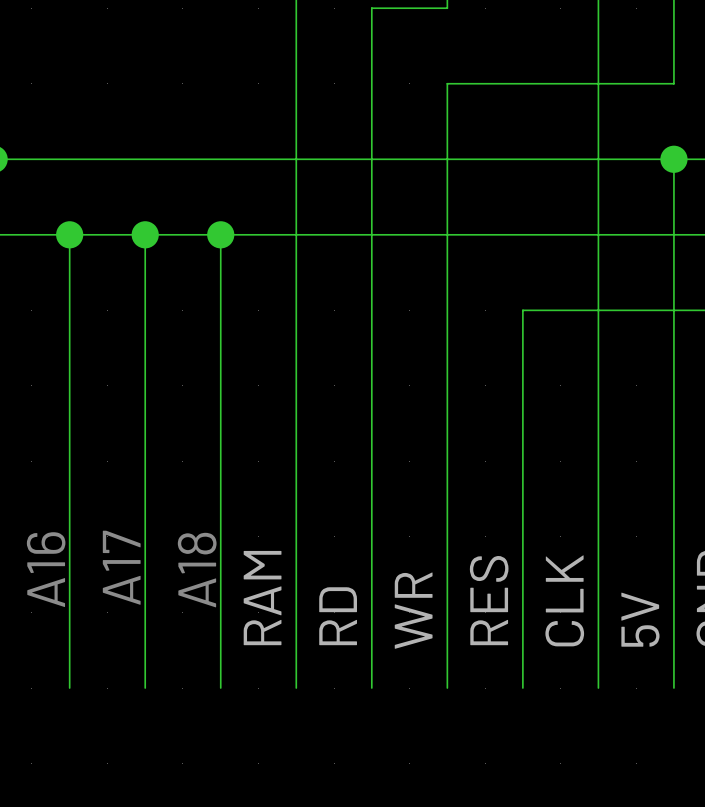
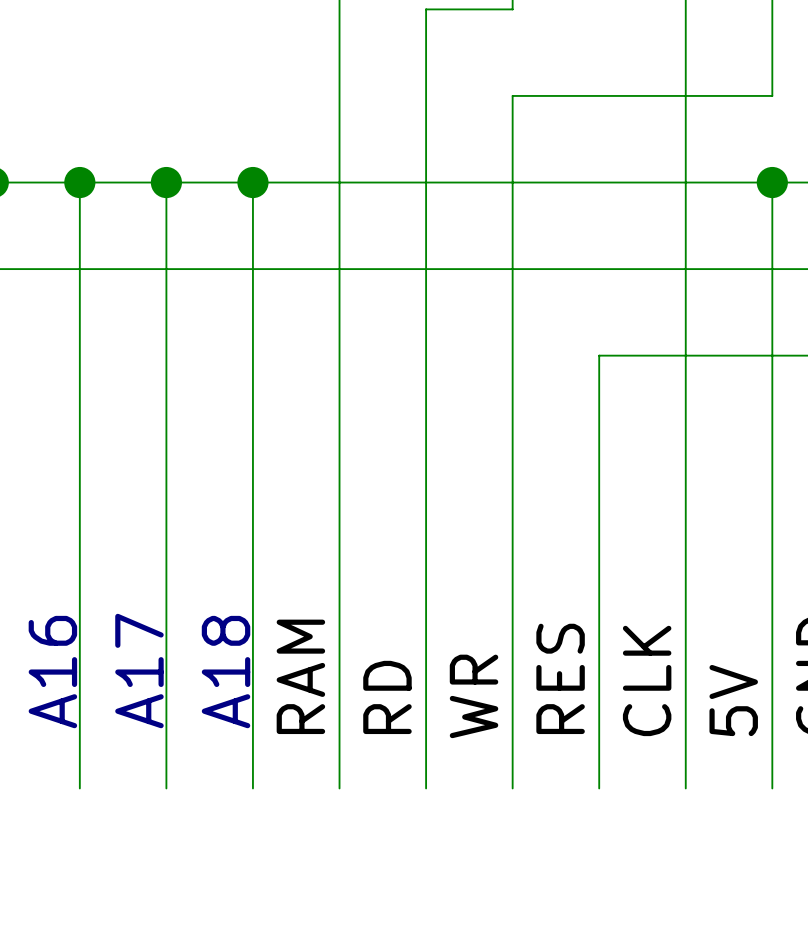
wire: none -> (79, 182) (79, 269)
junction: none -> (79, 182)
wire: none -> (166, 182) (166, 269)
junction: none -> (166, 182)
wire: none -> (252, 182) (252, 269)
junction: none -> (252, 182)
junction: (69, 234) -> none
junction: (145, 234) -> none
junction: (220, 234) -> none

